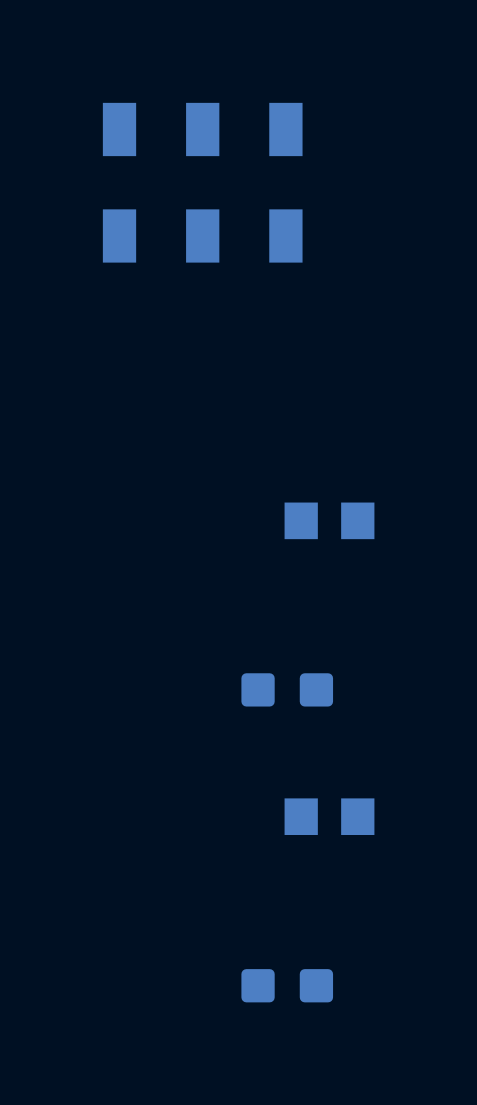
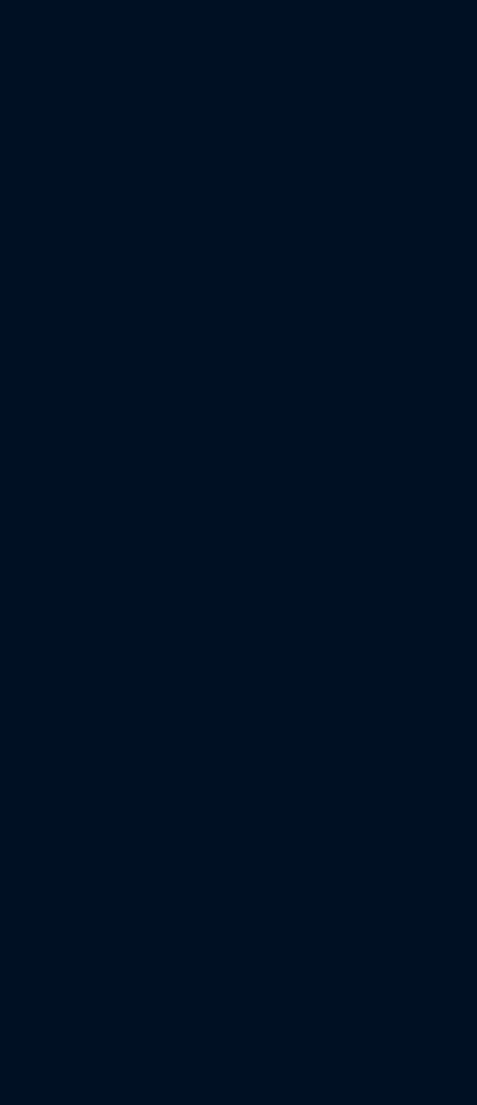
part: (202, 182) -> none
part: (329, 520) -> none
part: (287, 689) -> none
part: (329, 816) -> none
part: (287, 985) -> none

